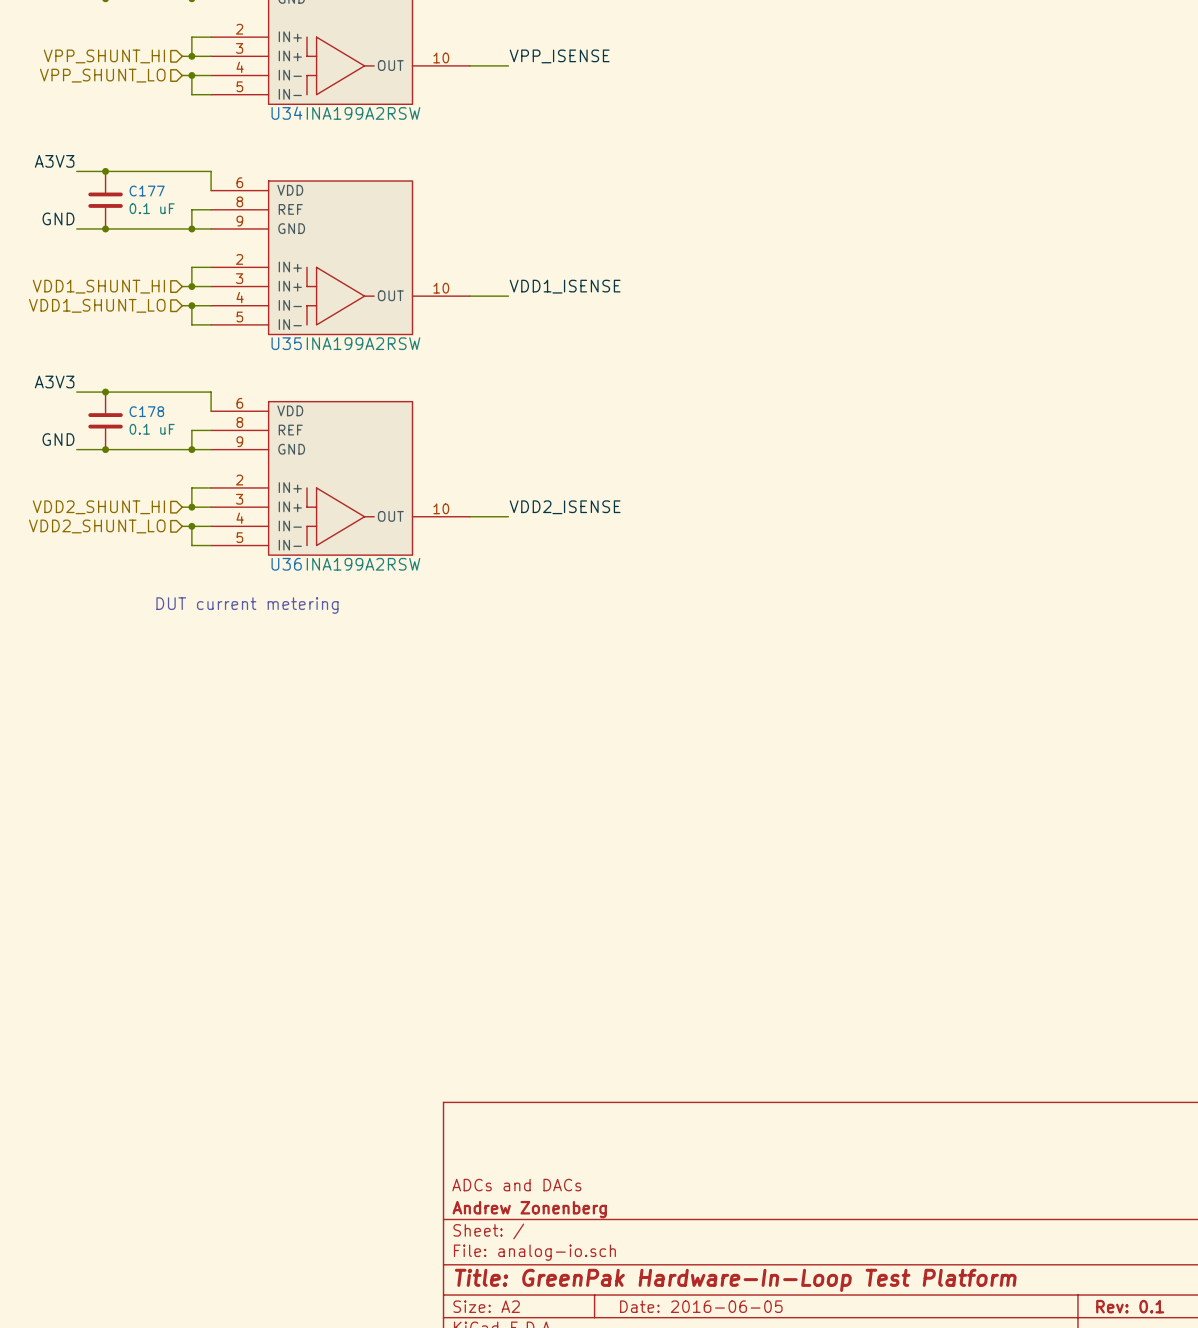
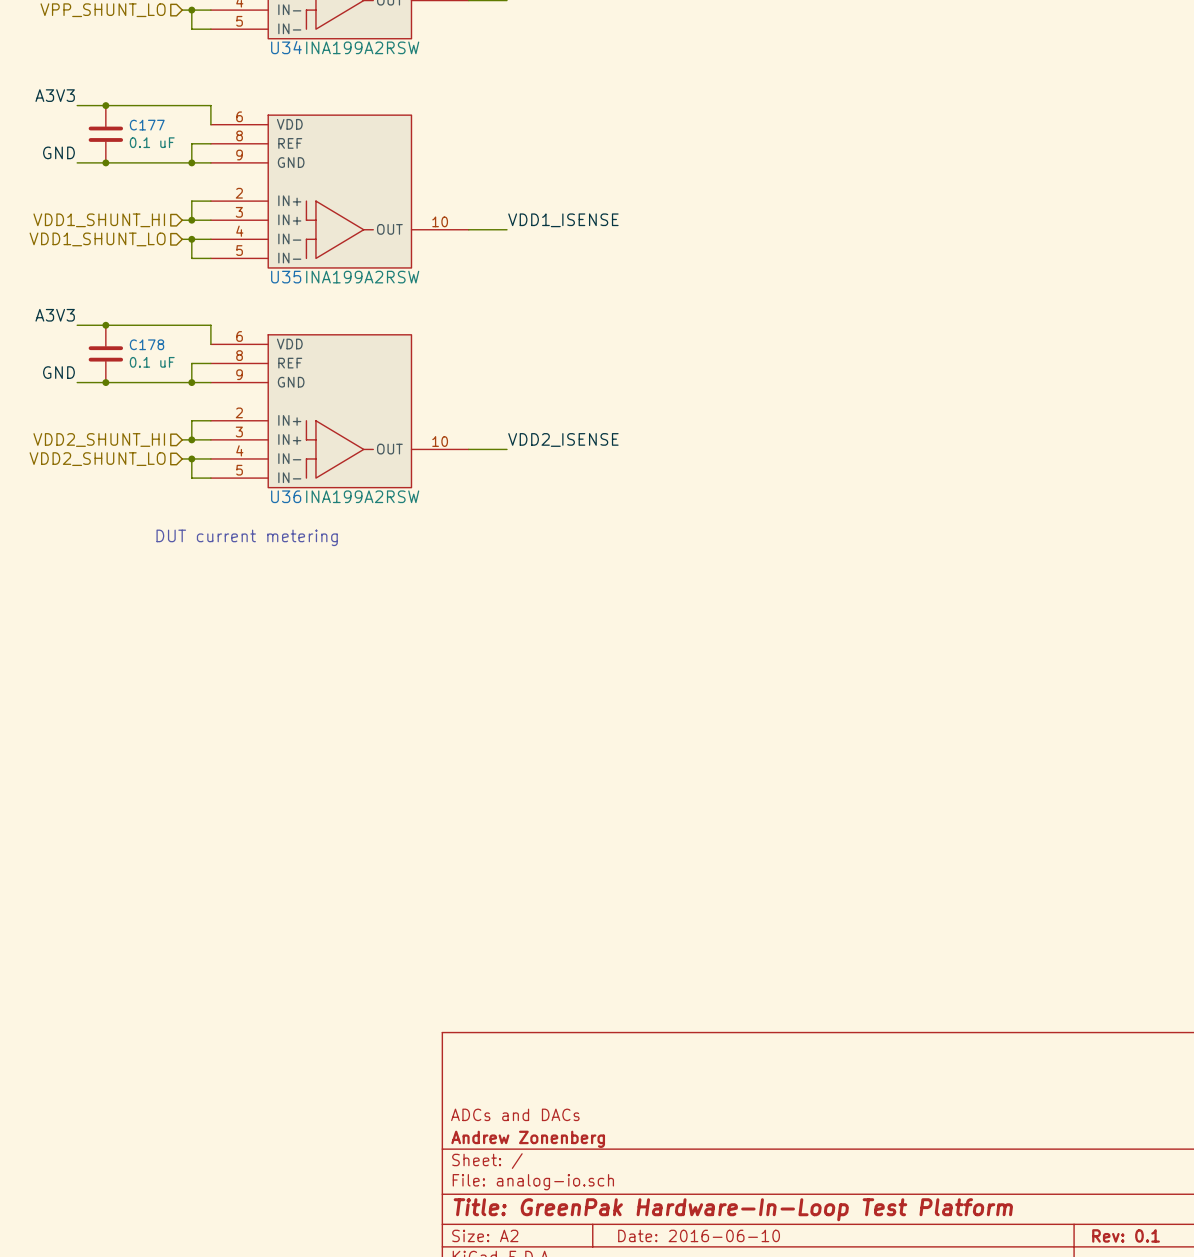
title block: Date: 2016-06-05 (701, 1306) -> Date: 2016-06-10 (699, 1235)

